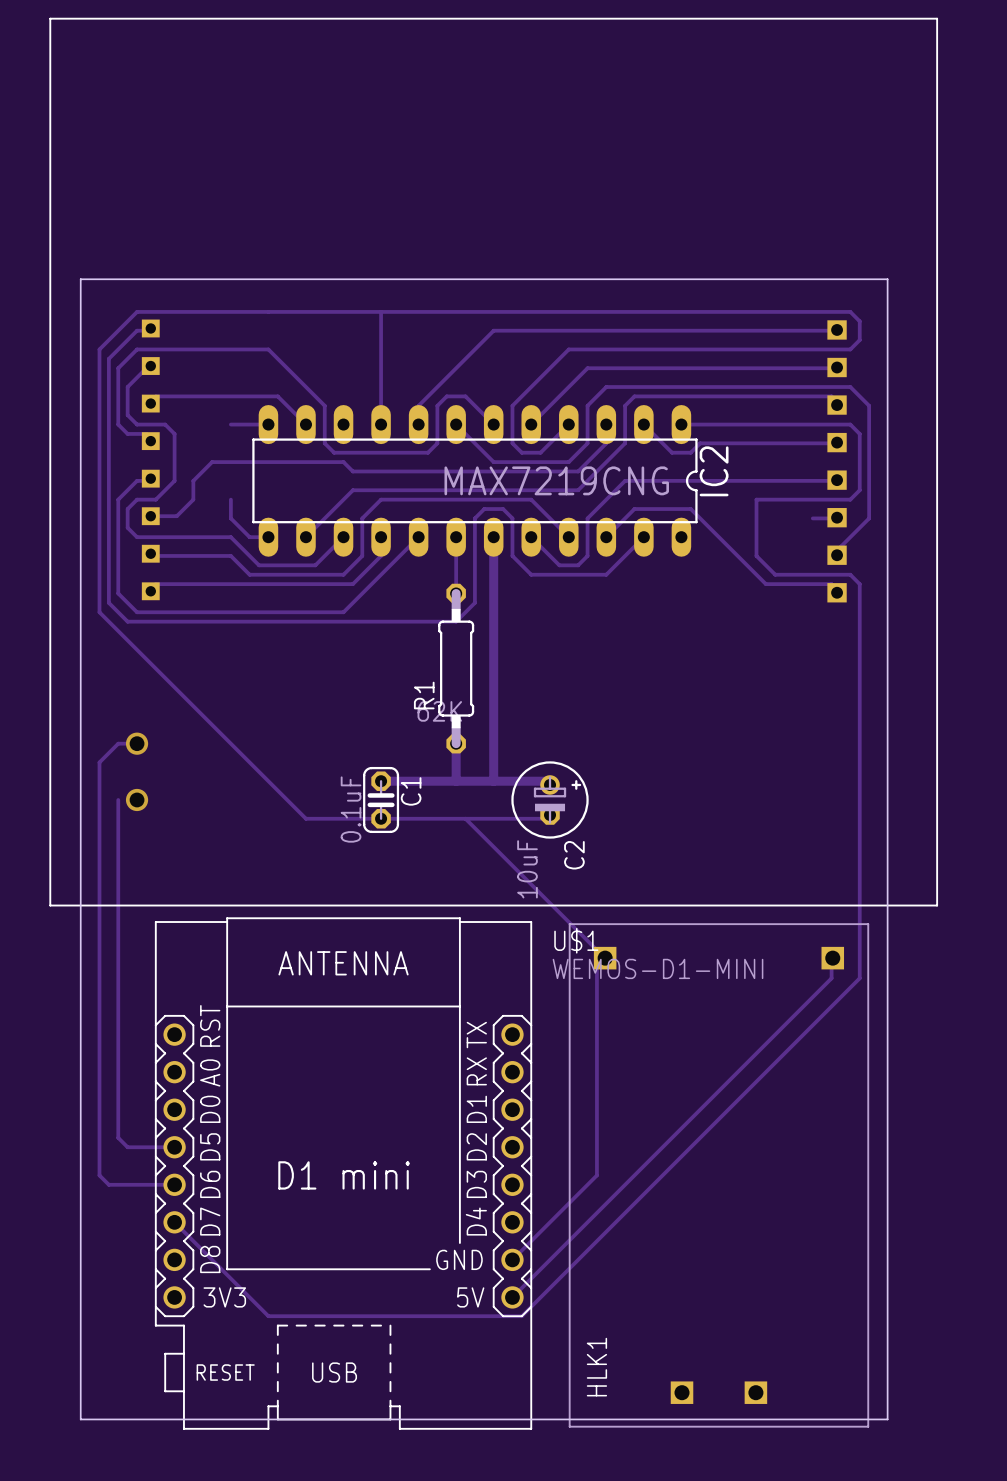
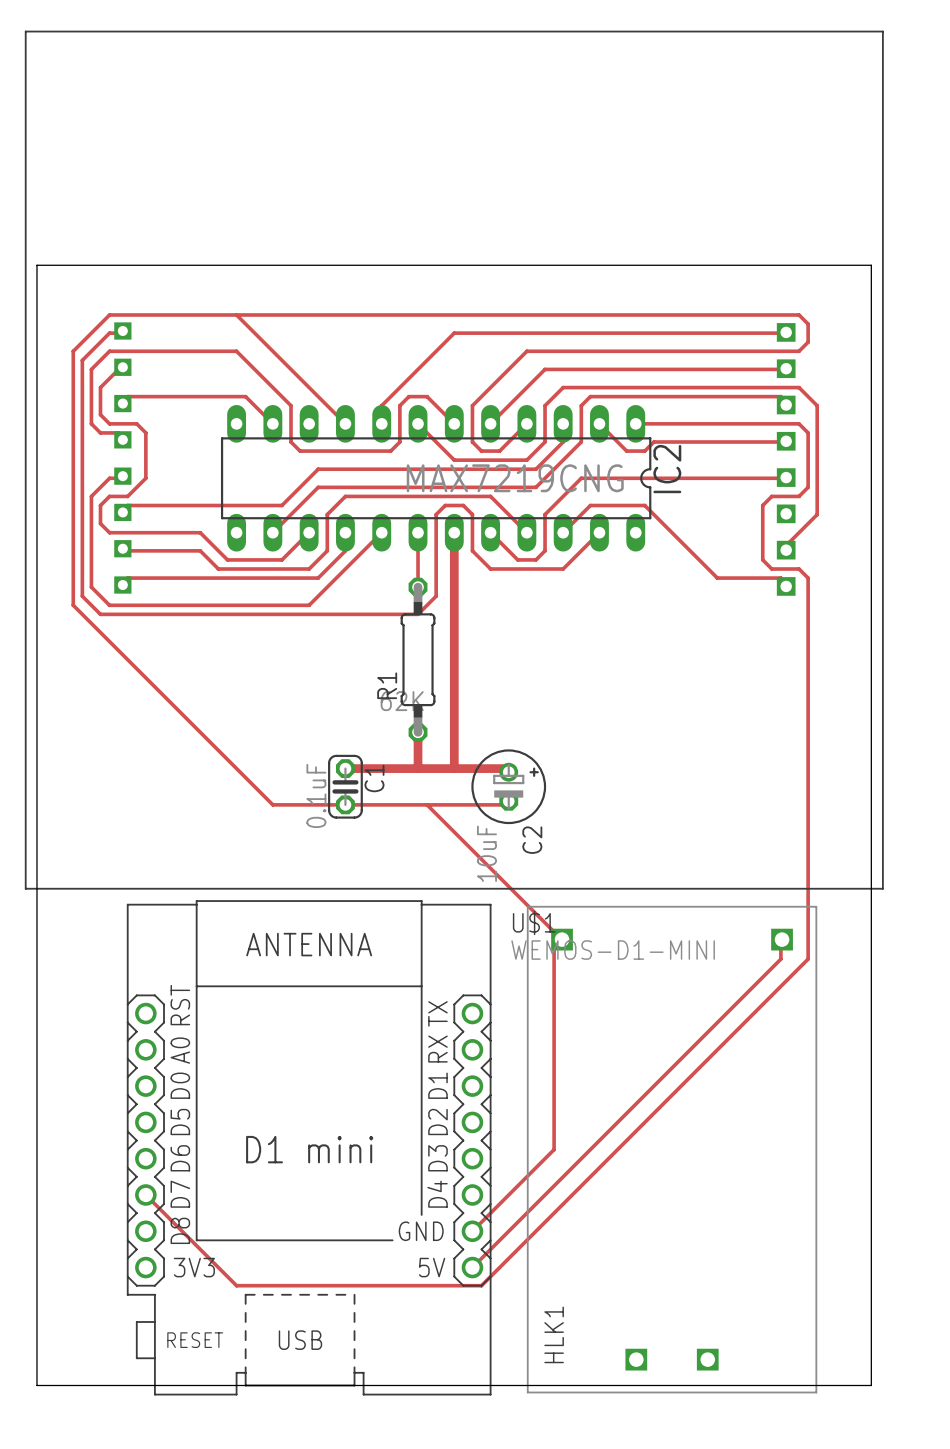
track: (381, 311) (381, 424) -> (236, 314) (345, 423)
track: (230, 424) (268, 424) -> none
track: (352, 471) (343, 462) (212, 462) (193, 480) (193, 499) (176, 516) (150, 516) -> (318, 469) (281, 505) (127, 505) (122, 512)
track: (230, 499) (230, 518) (249, 537) (268, 537) -> none
track: (822, 499) (756, 499) (756, 555) (775, 574) (822, 574) -> (771, 496) (762, 505) (762, 559) (771, 569)
track: (837, 517) (812, 518) -> none
track: (137, 743) (118, 743) (99, 762) (99, 1175) (108, 1184) (174, 1184) -> none
via: (137, 743) -> none
track: (118, 799) (118, 1137) (127, 1147) (174, 1147) -> none
via: (137, 799) -> none
board edge: (80, 1419) (80, 279) (887, 279) (887, 1419) -> (55, 1385) (36, 1385) (36, 265) (871, 265) (871, 1385) (835, 1385)

